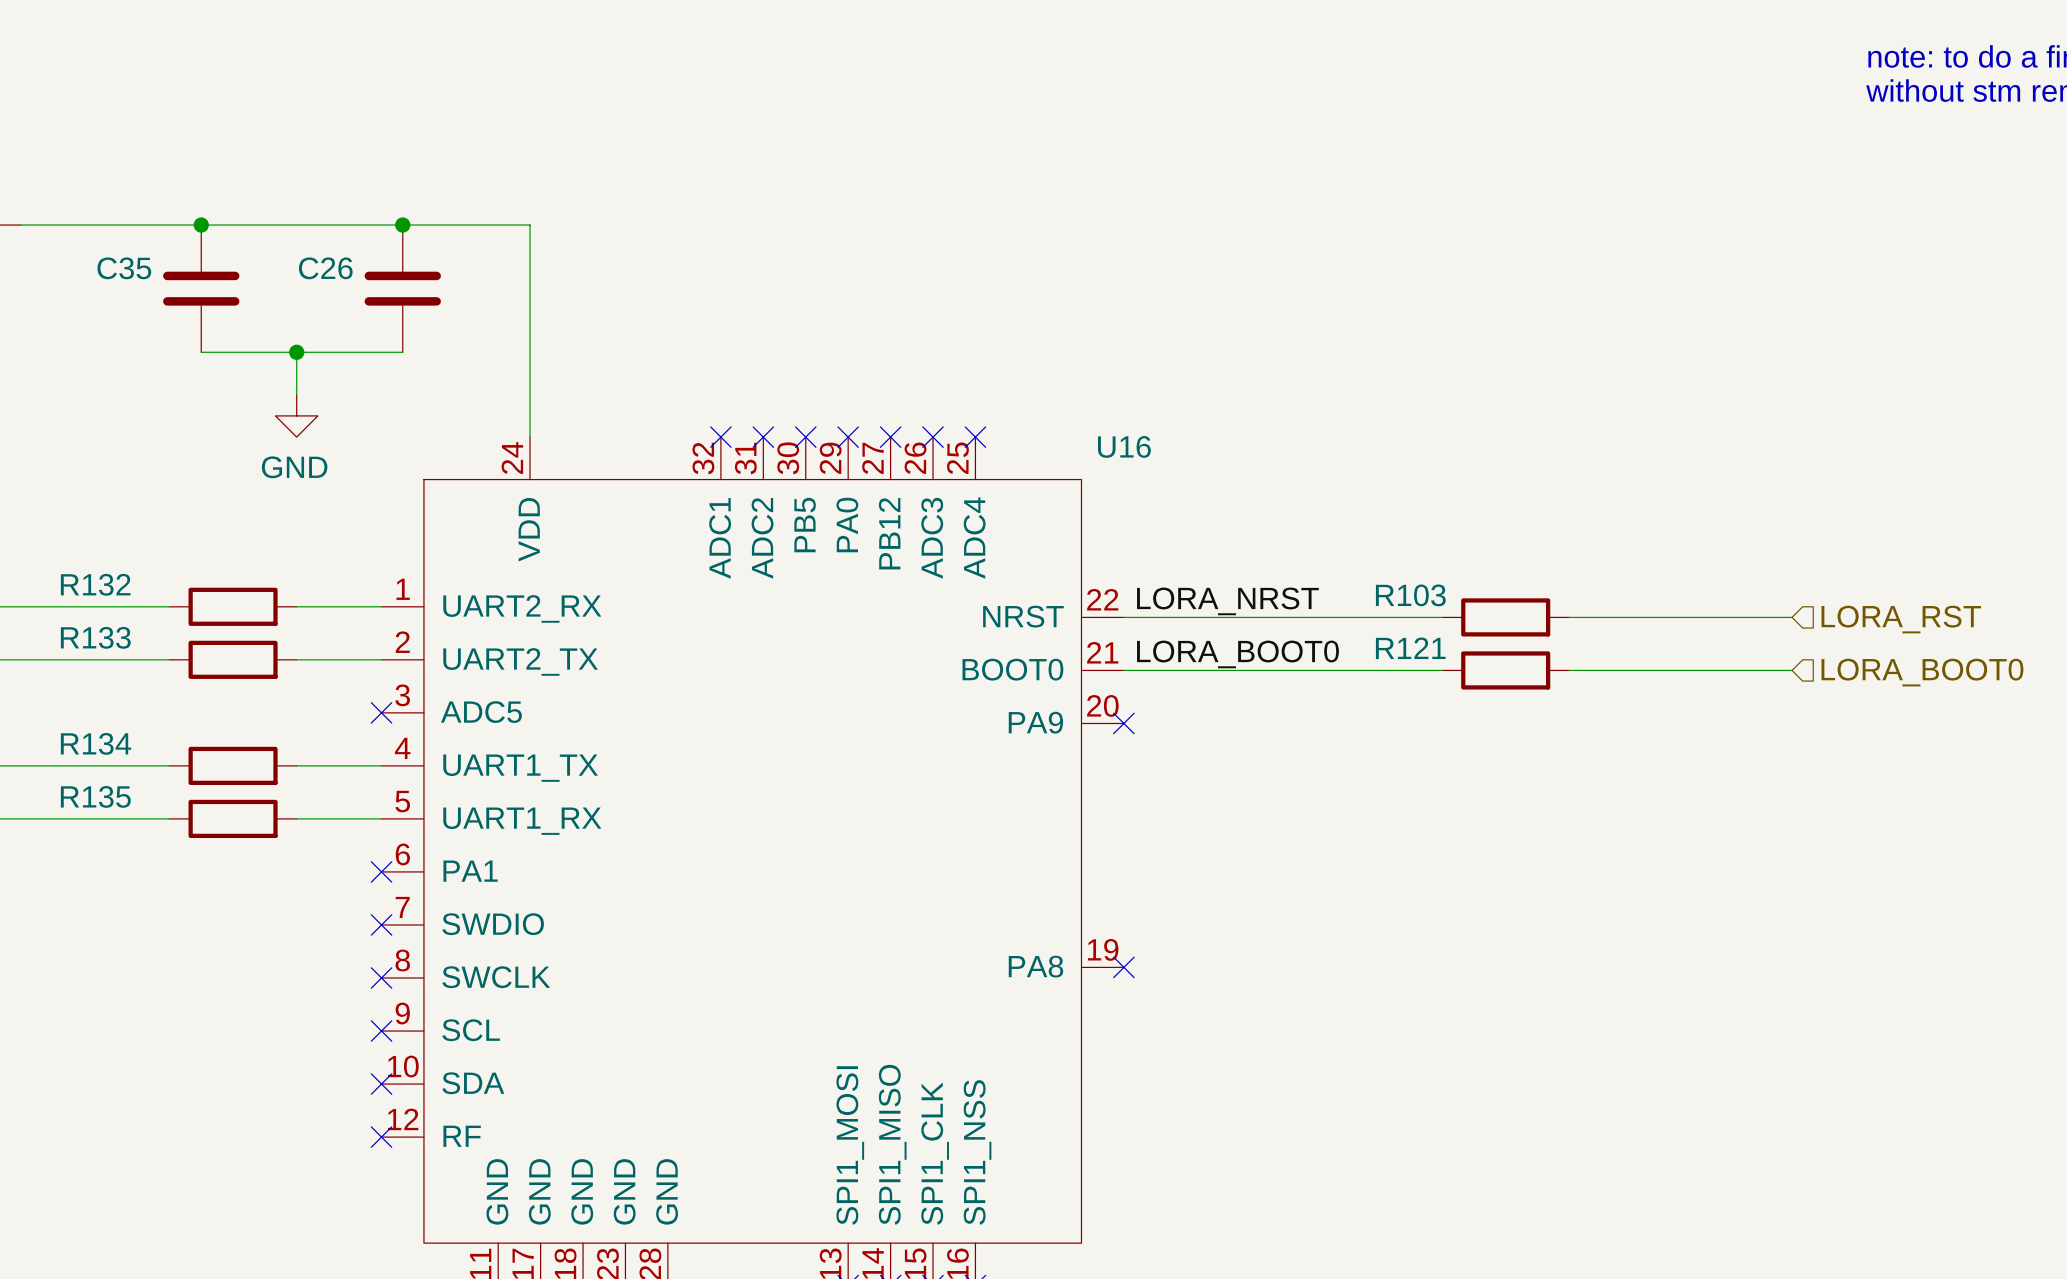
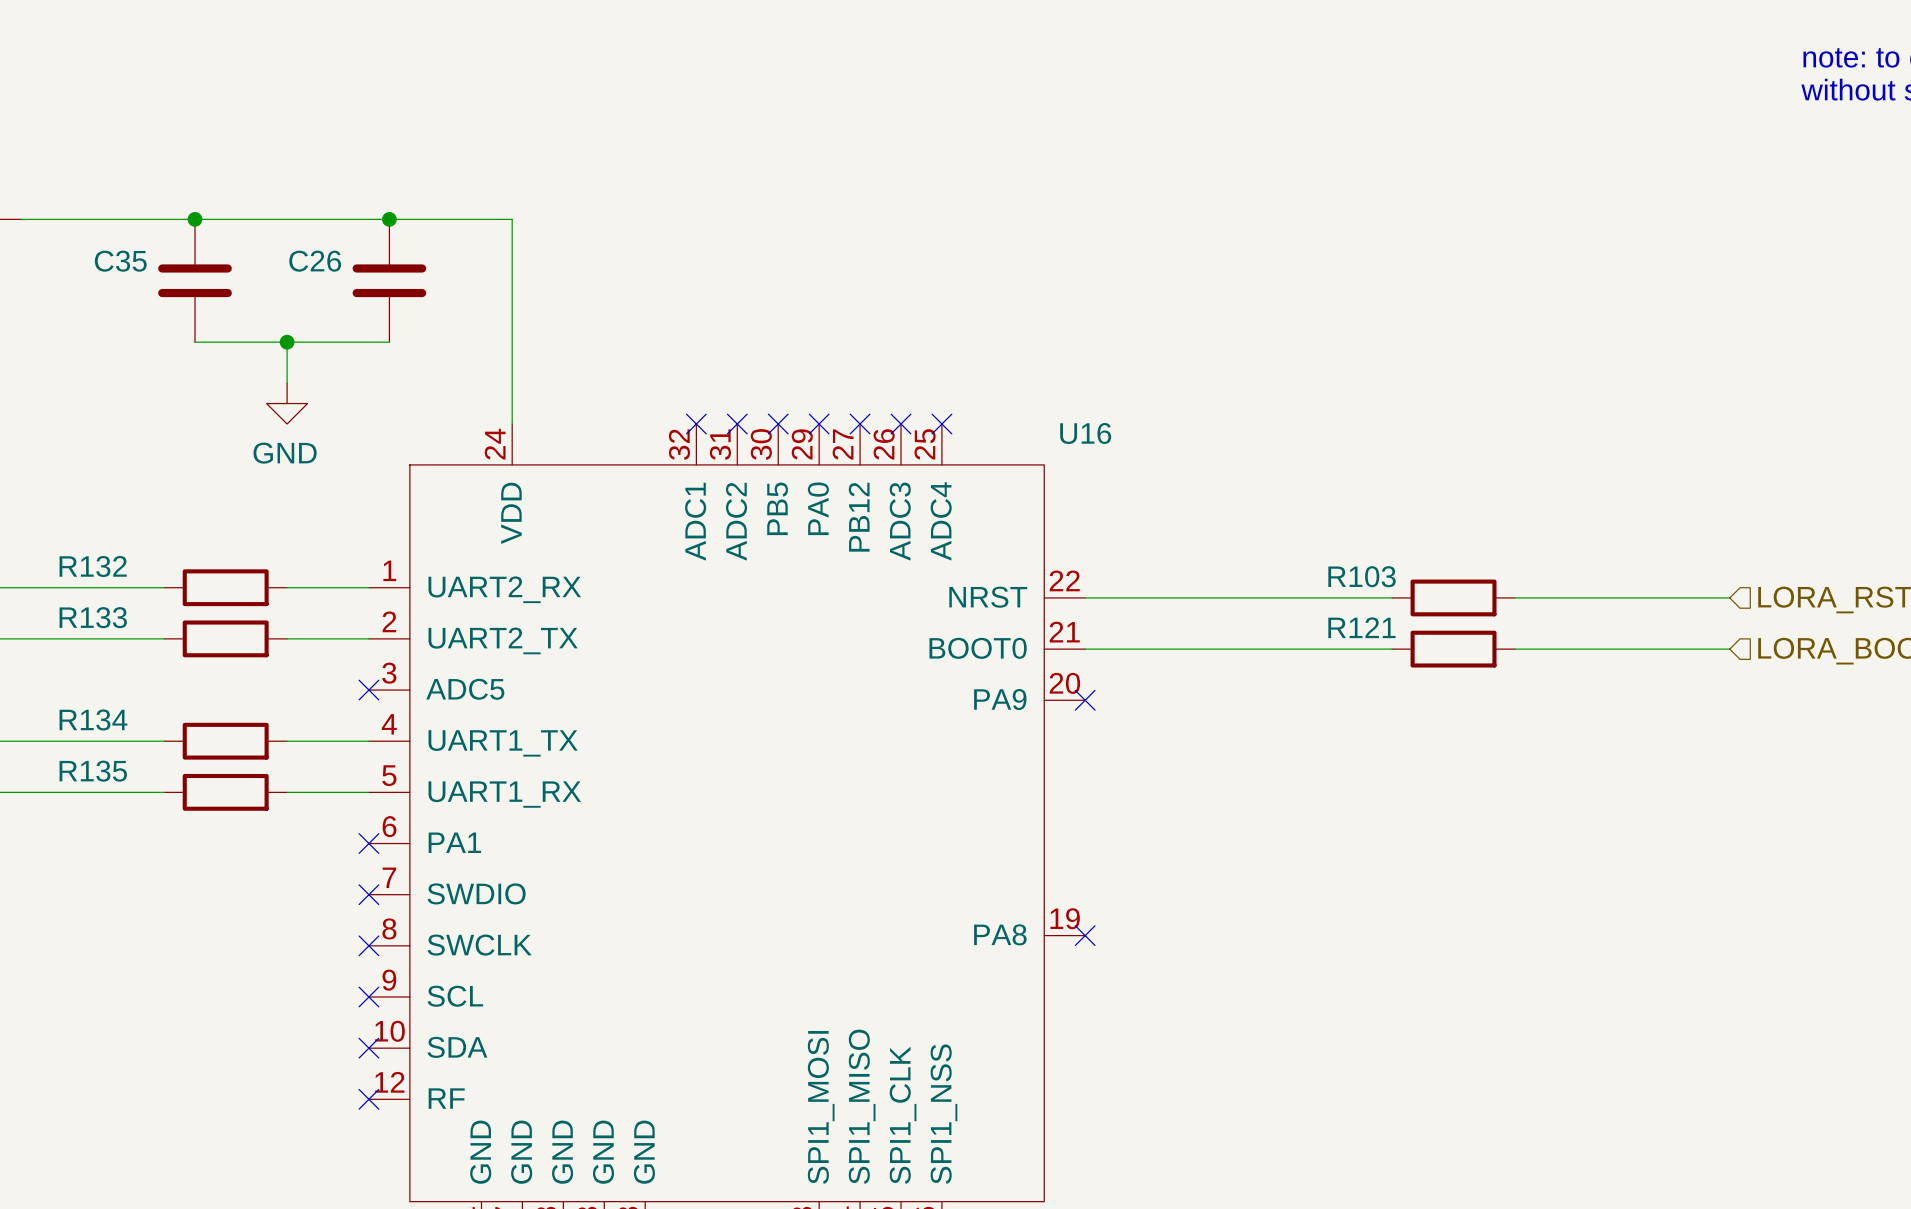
label: LORA_NRST (1227, 601) -> none
label: LORA_BOOT0 (1237, 654) -> none

